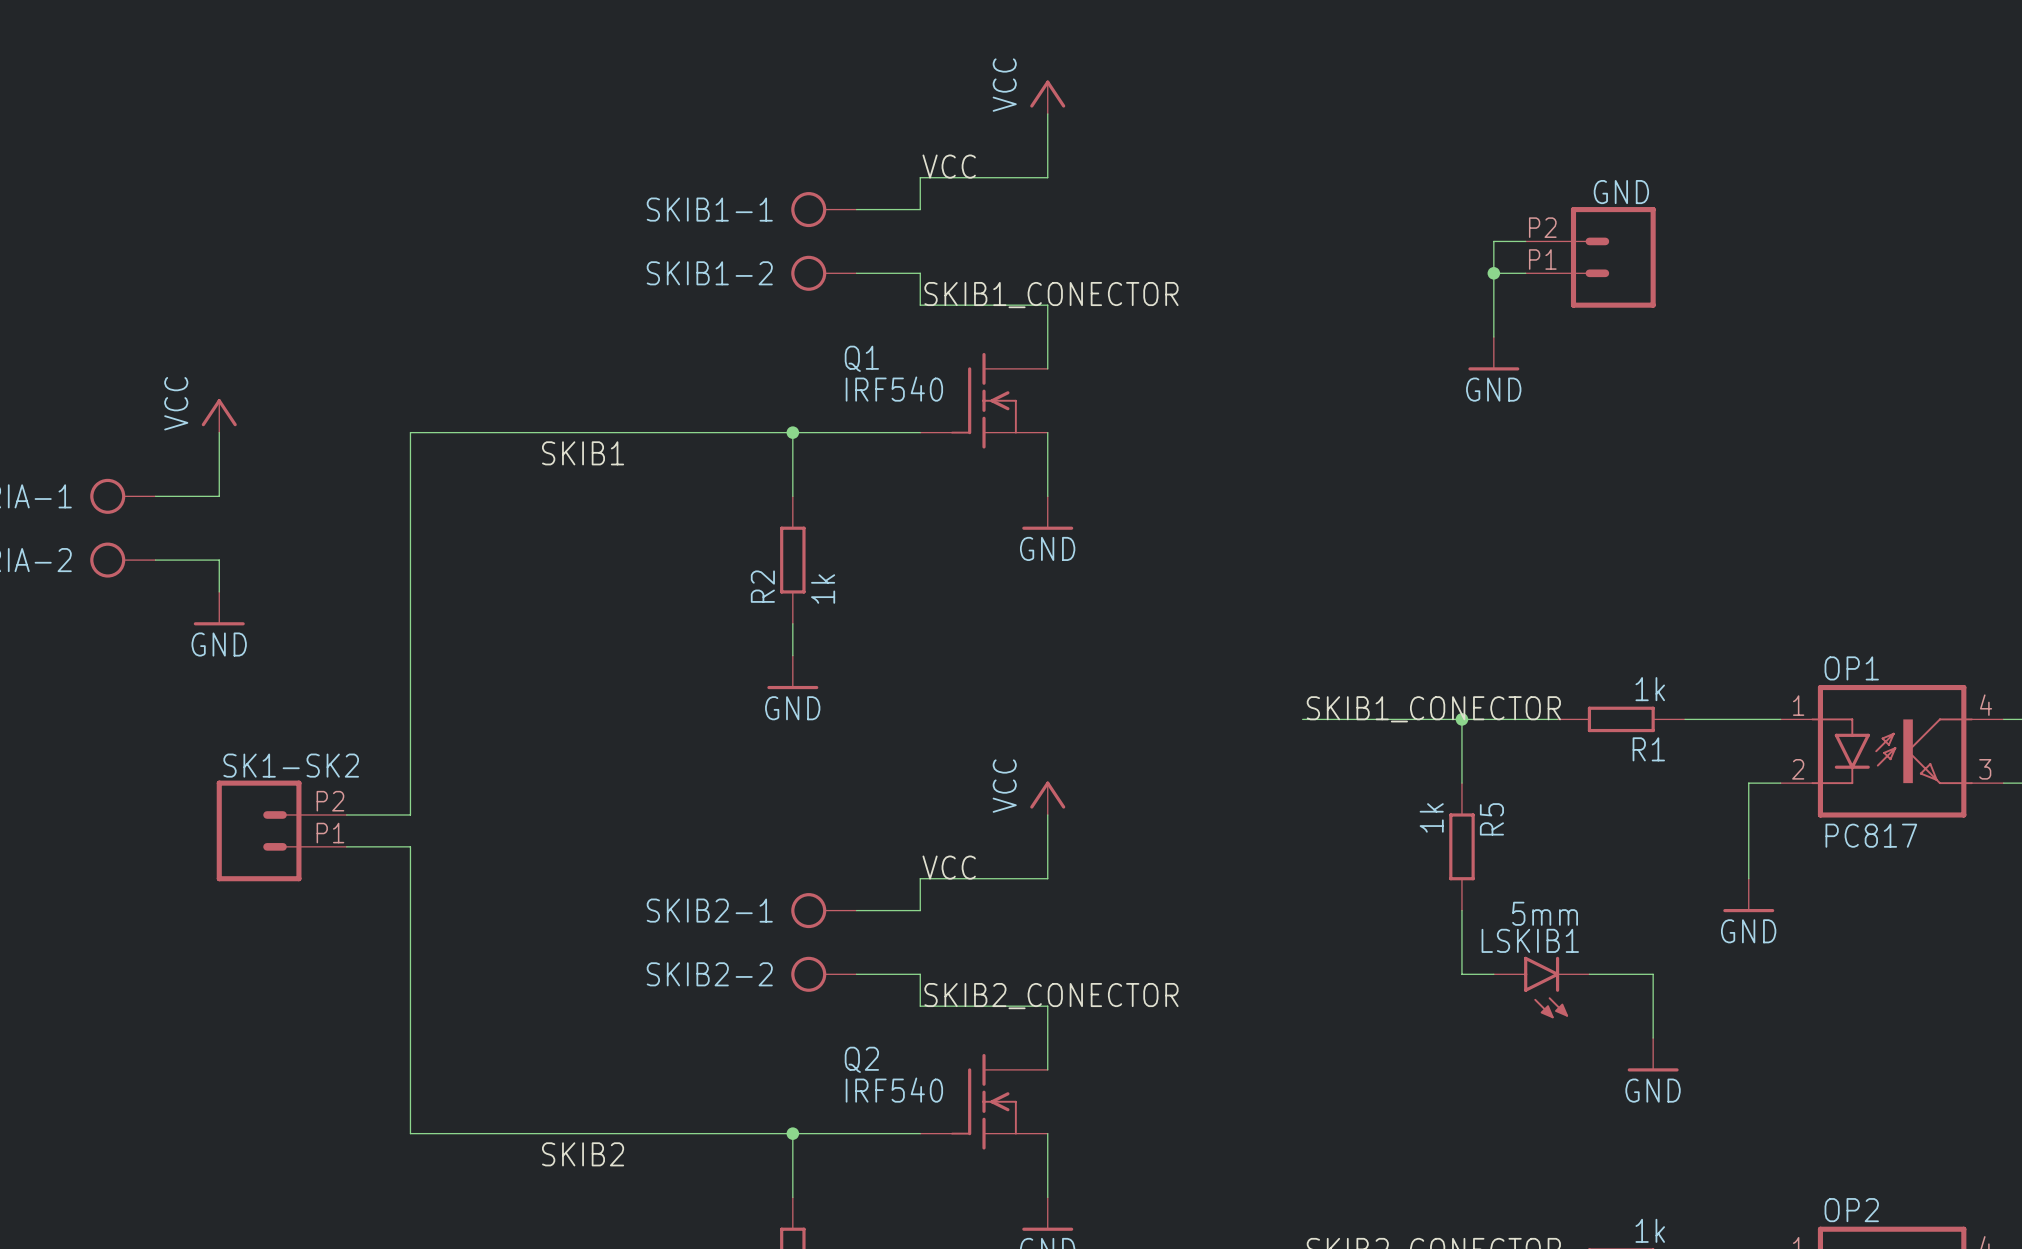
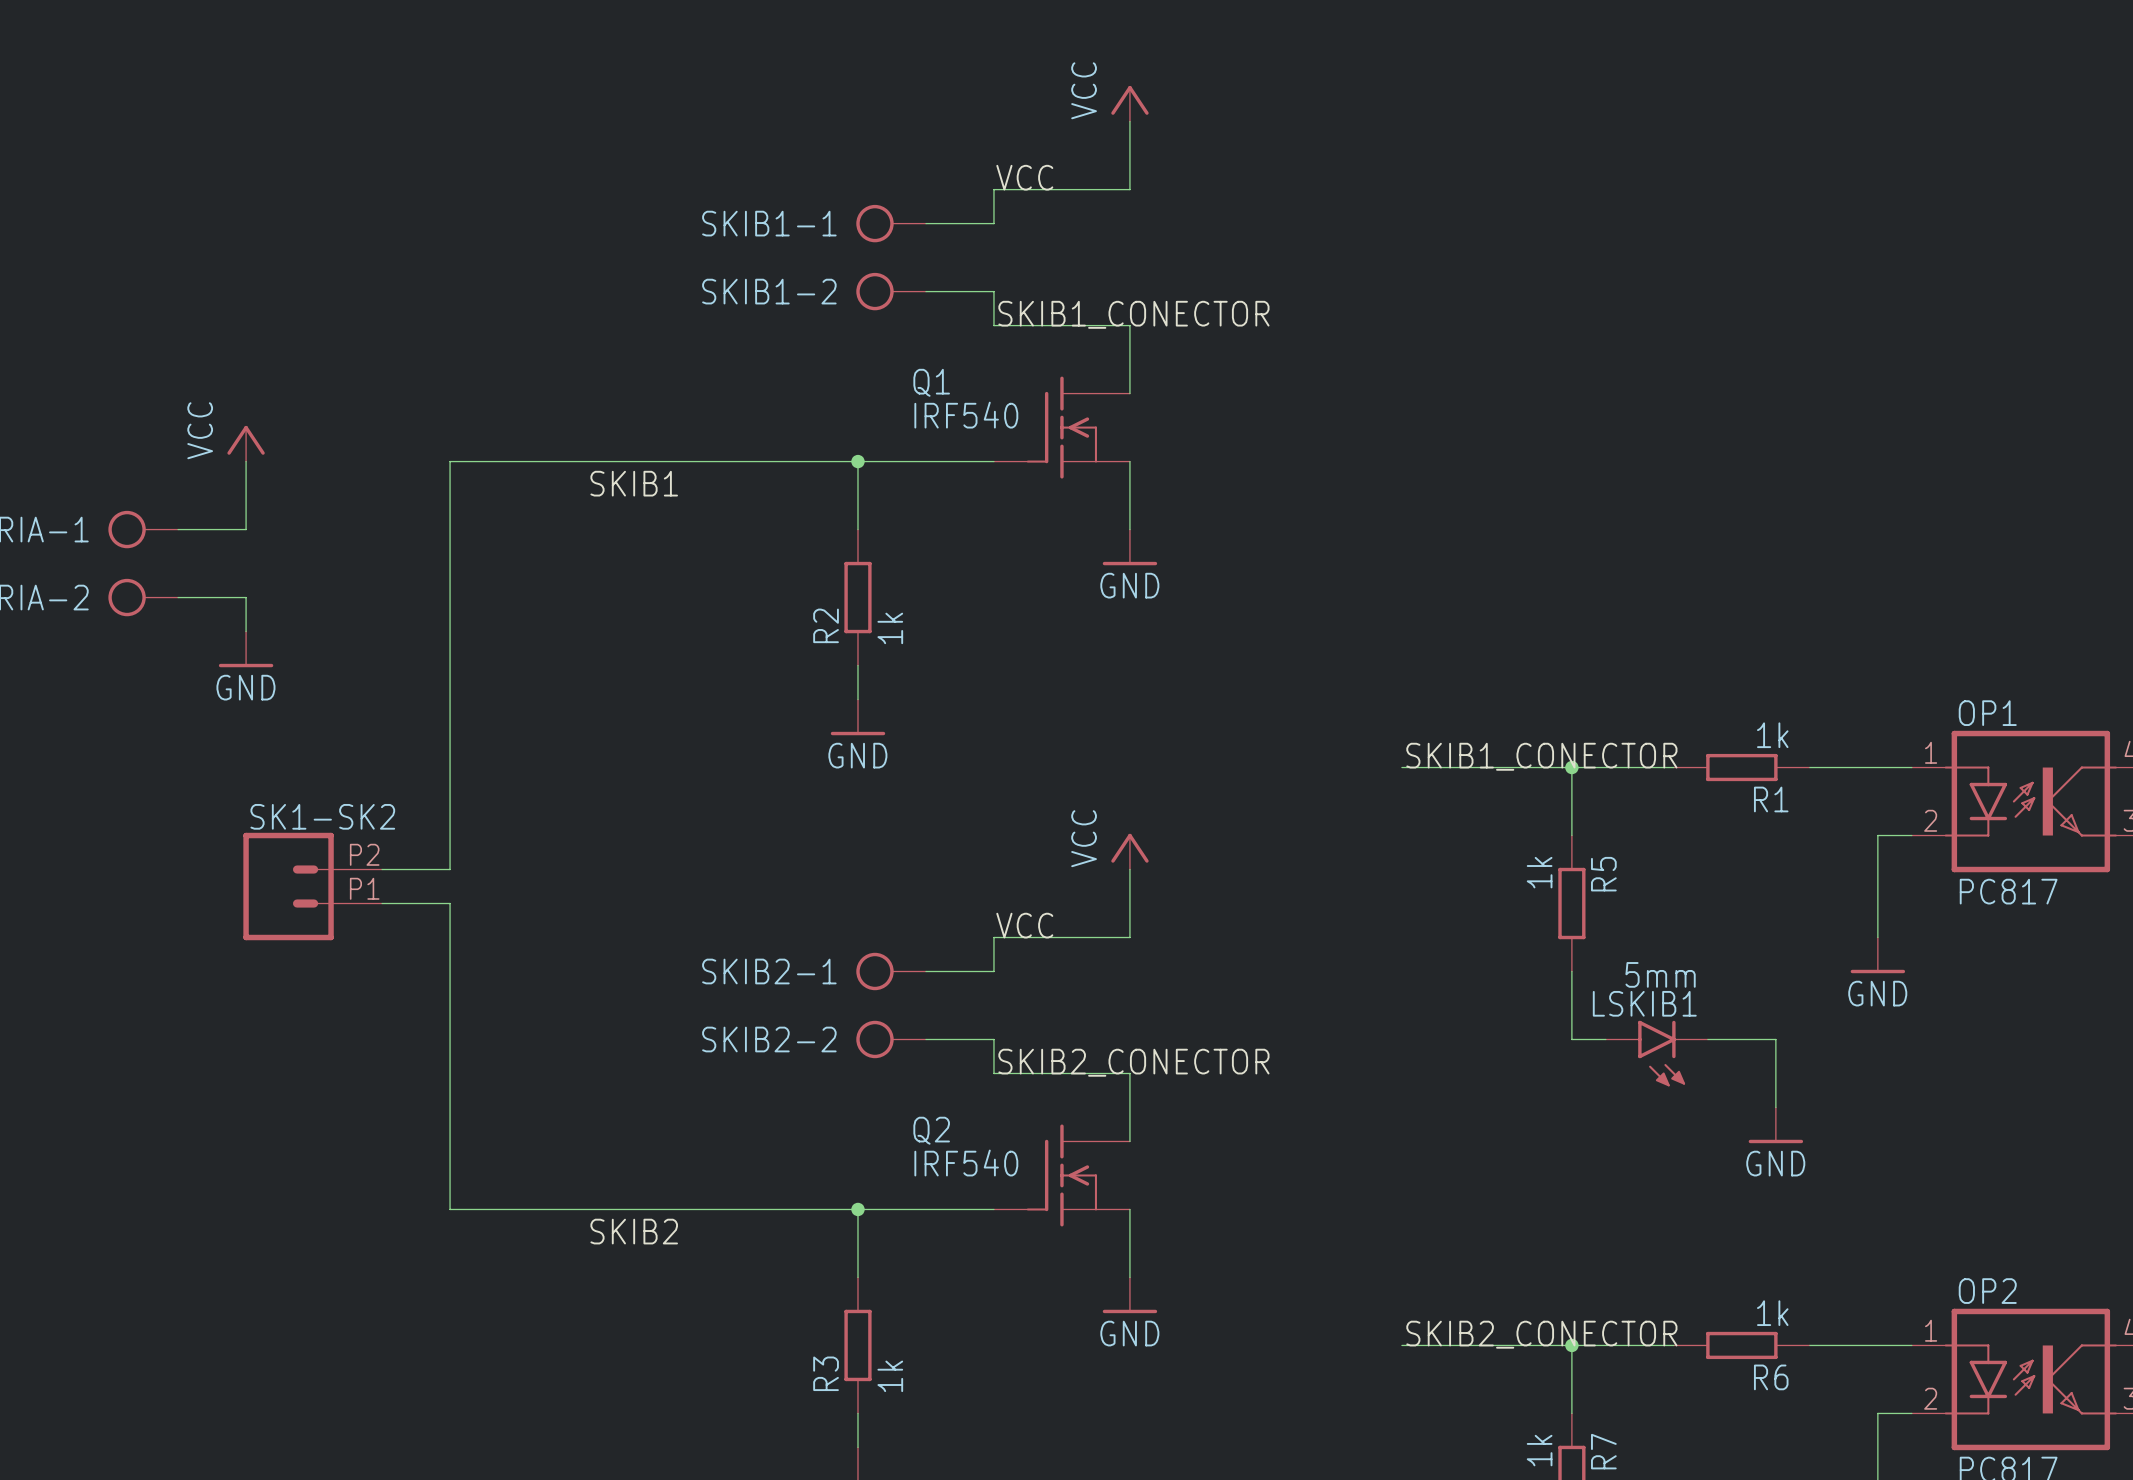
wire: (1525, 241) (1493, 241) (1493, 337) -> none
GND: (1590, 257) -> none
wire: (1493, 273) (1525, 273) -> none
junction: (1493, 273) -> none
power symbol: GND (1493, 353) -> none

